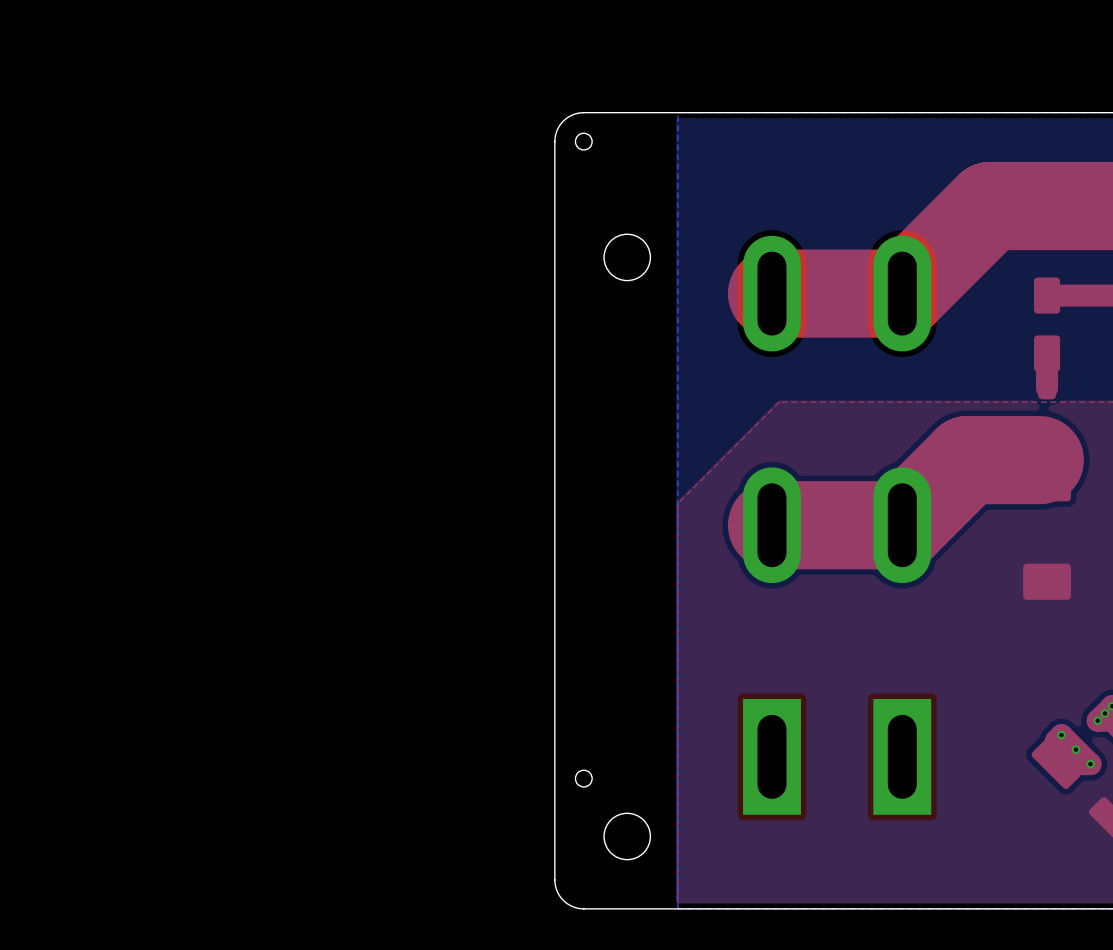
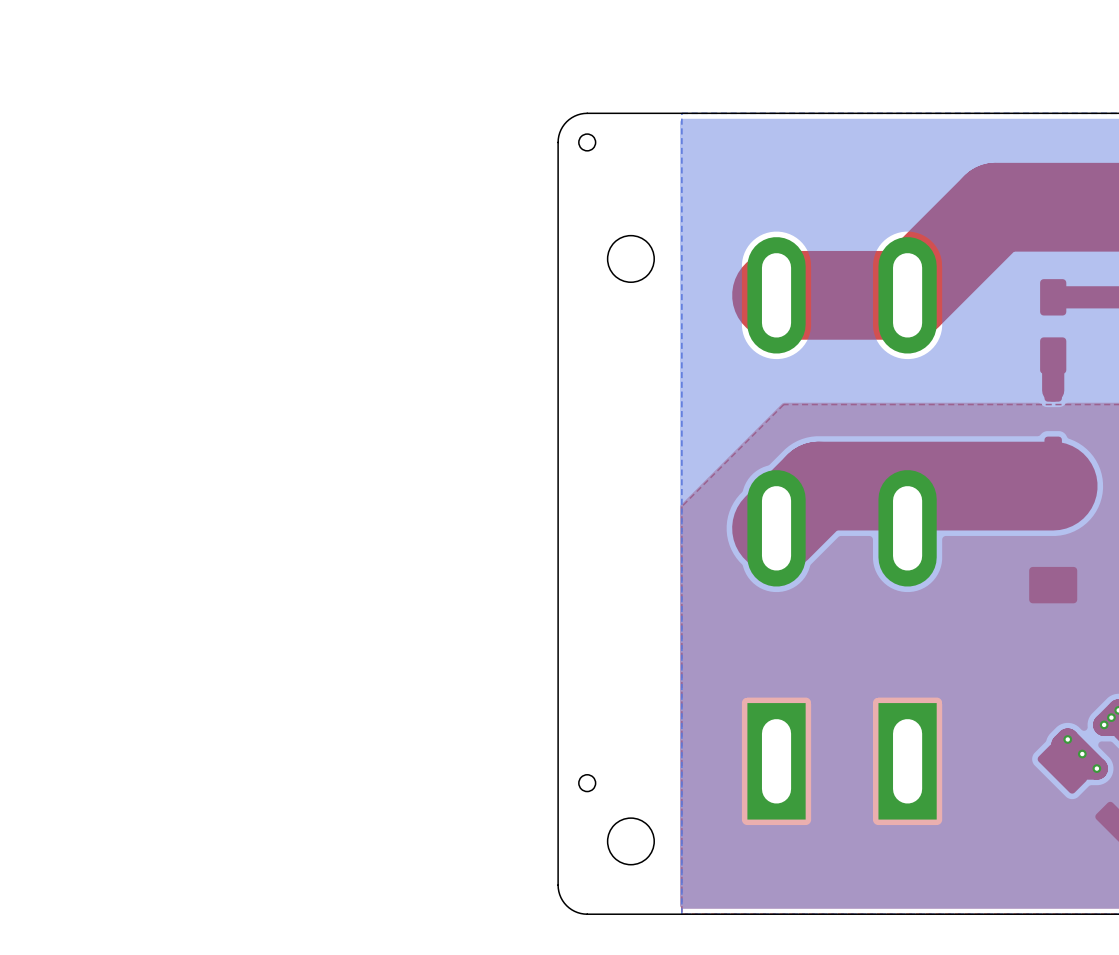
top track: (1039, 460) (967, 460) (902, 525) (771, 525) -> (1053, 486) (818, 486) (776, 528)

